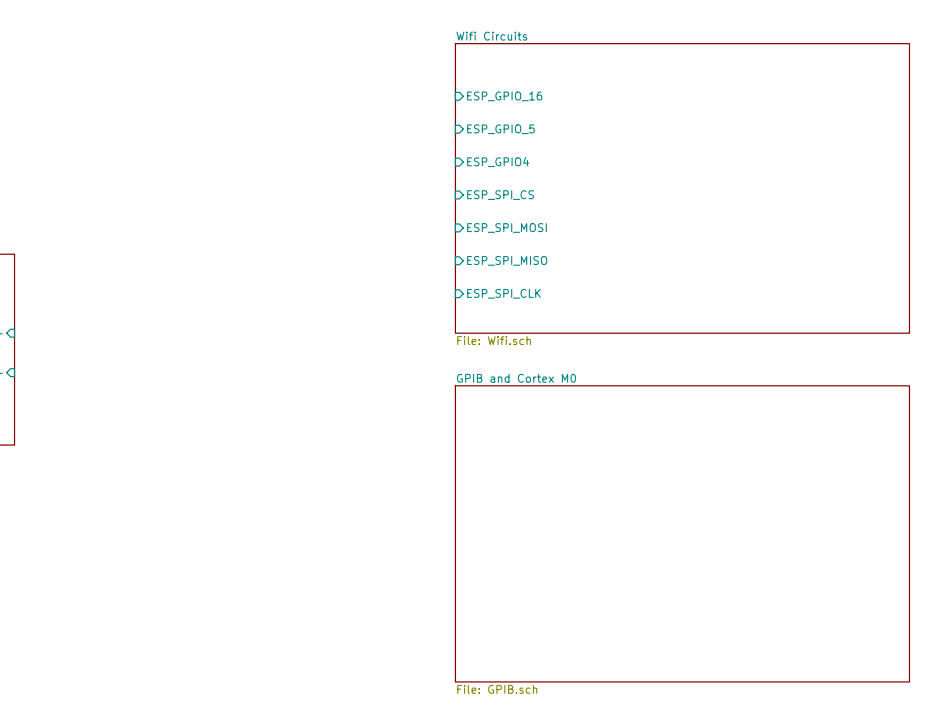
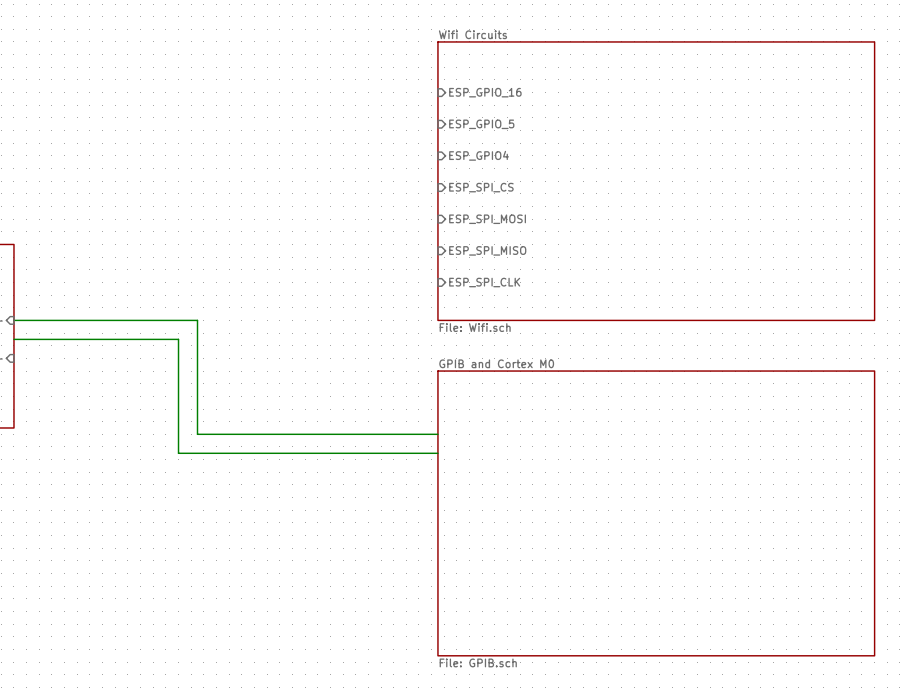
wire: none -> (13, 320) (197, 320) (197, 434) (437, 434)
wire: none -> (13, 339) (178, 339) (178, 453) (437, 453)

